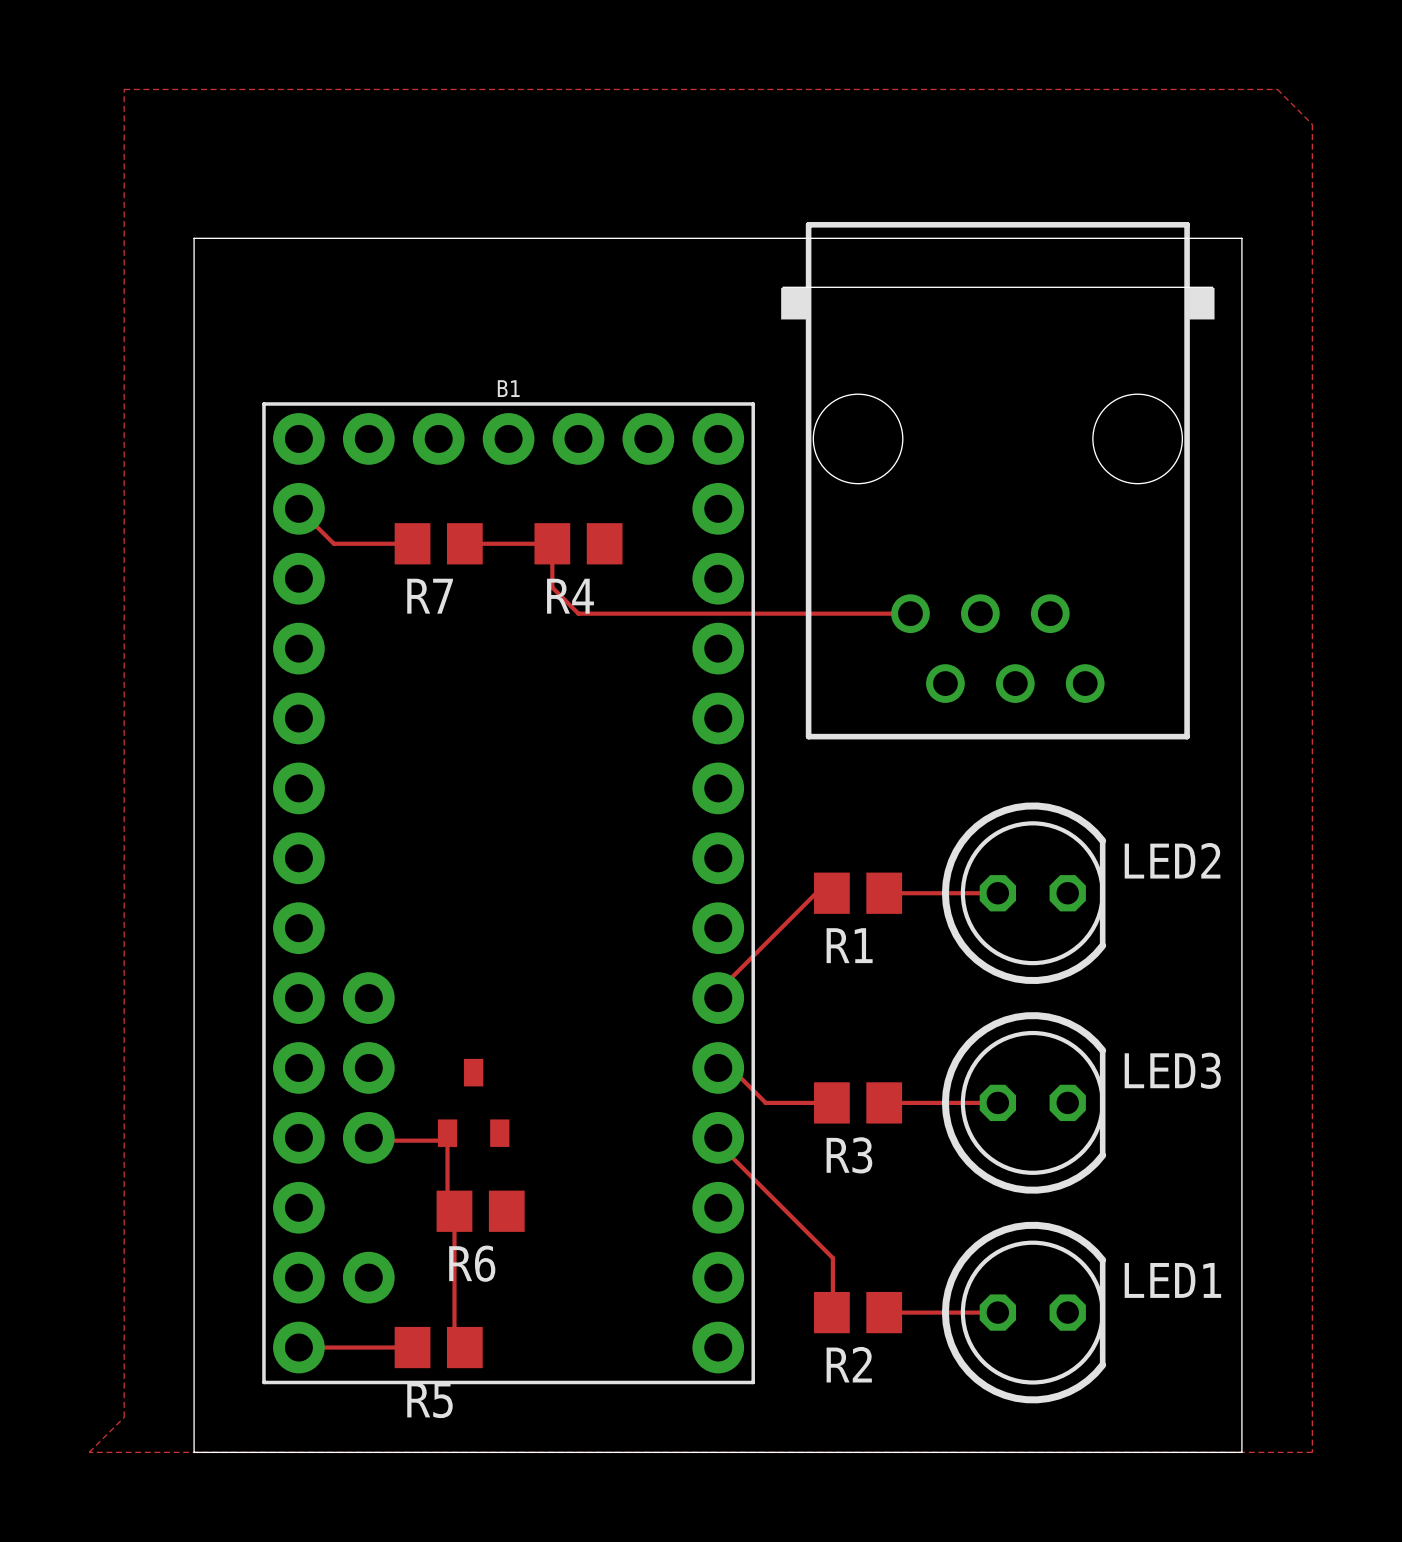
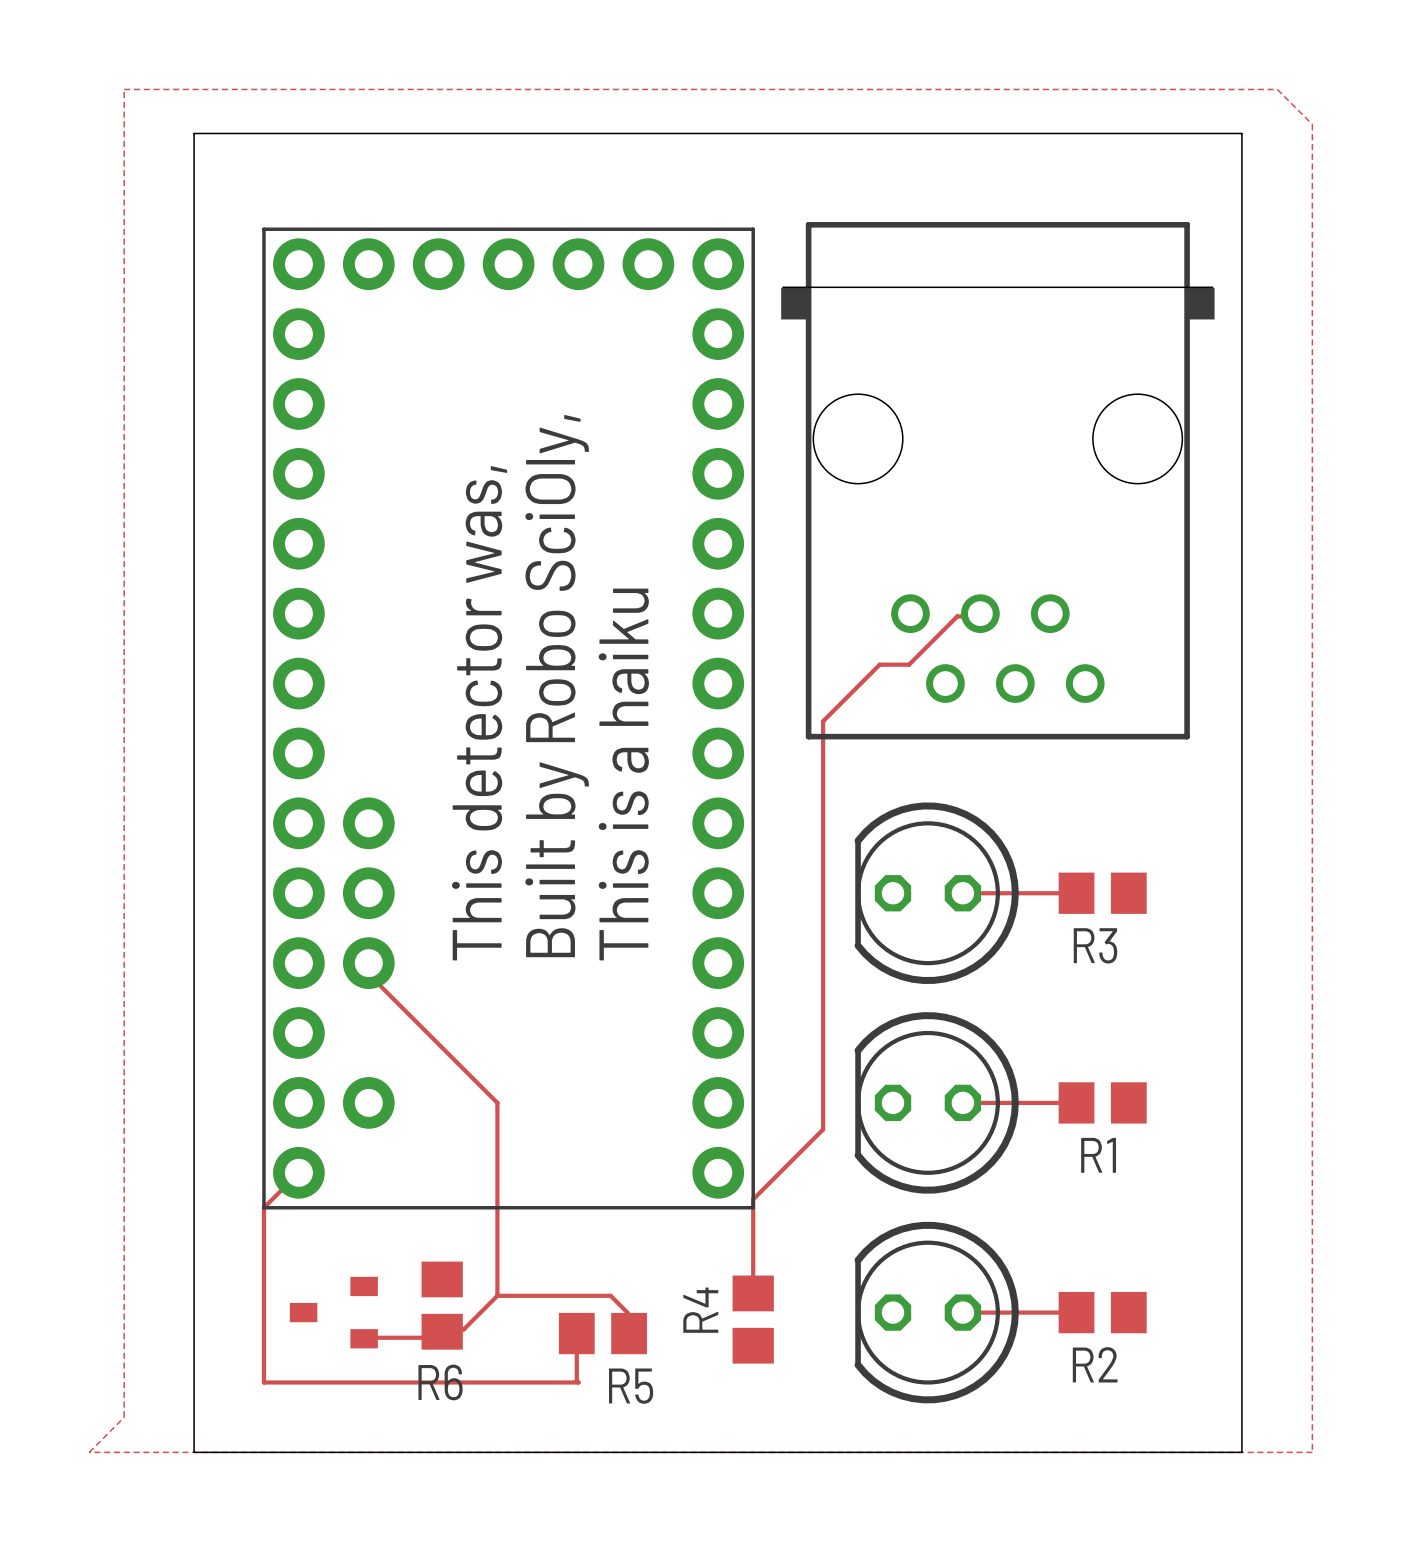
board edge: (194, 238) (1241, 238) -> (194, 238) (194, 133) (1241, 133) (1241, 238)
track: (298, 508) (333, 543) (412, 543) -> none
R7: (438, 543) -> none
track: (464, 543) (552, 543) (552, 587) (578, 613) (910, 613) -> none
R4 rotation: 0° (578, 543) -> 90° clockwise (753, 1319)
R4 position: (578, 543) -> (753, 1319)
text: none -> Built by Robo SciOly, (557, 686)
track: none -> (980, 613) (979, 616) (957, 616) (909, 664) (879, 664) (823, 721) (823, 1129) (753, 1199) (753, 1293)
text: none -> This detector was, (479, 713)
text: none -> This is a haiku (623, 774)
part: none -> (508, 718)
B1: (508, 893) -> none
track: (831, 893) (816, 893) (719, 989) (718, 998) -> none
R1 position: (858, 893) -> (1102, 1102)
track: (884, 893) (962, 893) -> (997, 893) (1076, 893)
part: none -> (936, 893)
LED2: (1024, 893) -> none
track: none -> (368, 963) (371, 964) (371, 977) (497, 1102) (497, 1295)
track: (718, 1067) (732, 1069) (765, 1102) (831, 1102) -> none
part rotation: 0° (473, 1102) -> 90° counterclockwise (333, 1312)
part position: (473, 1102) -> (333, 1312)
R3 position: (858, 1102) -> (1102, 893)
track: (884, 1102) (962, 1102) -> (997, 1102) (1076, 1102)
part: none -> (936, 1102)
LED3: (1024, 1102) -> none
track: (447, 1133) (447, 1204) (454, 1211) (454, 1337) (464, 1347) -> none
track: (368, 1137) (371, 1140) (449, 1140) (454, 1145) -> none
track: (718, 1137) (715, 1140) (832, 1258) (831, 1312) -> none
track: none -> (298, 1172) (263, 1207) (263, 1382) (578, 1382) (576, 1380) (576, 1333)
R6 rotation: 0° (480, 1211) -> 90° clockwise (442, 1305)
R6 position: (480, 1211) -> (442, 1305)
track: none -> (497, 1295) (610, 1295) (627, 1312) (627, 1333) (629, 1333)
track: none -> (497, 1295) (463, 1329) (442, 1329) (434, 1337) (364, 1338)
R2 position: (858, 1312) -> (1102, 1312)
track: (884, 1312) (962, 1312) -> (997, 1312) (1076, 1312)
part: none -> (936, 1312)
LED1: (1024, 1312) -> none
track: (298, 1347) (412, 1347) -> none
R5 position: (438, 1347) -> (602, 1333)
R5 name position: R5 (429, 1400) -> R5 (631, 1386)

